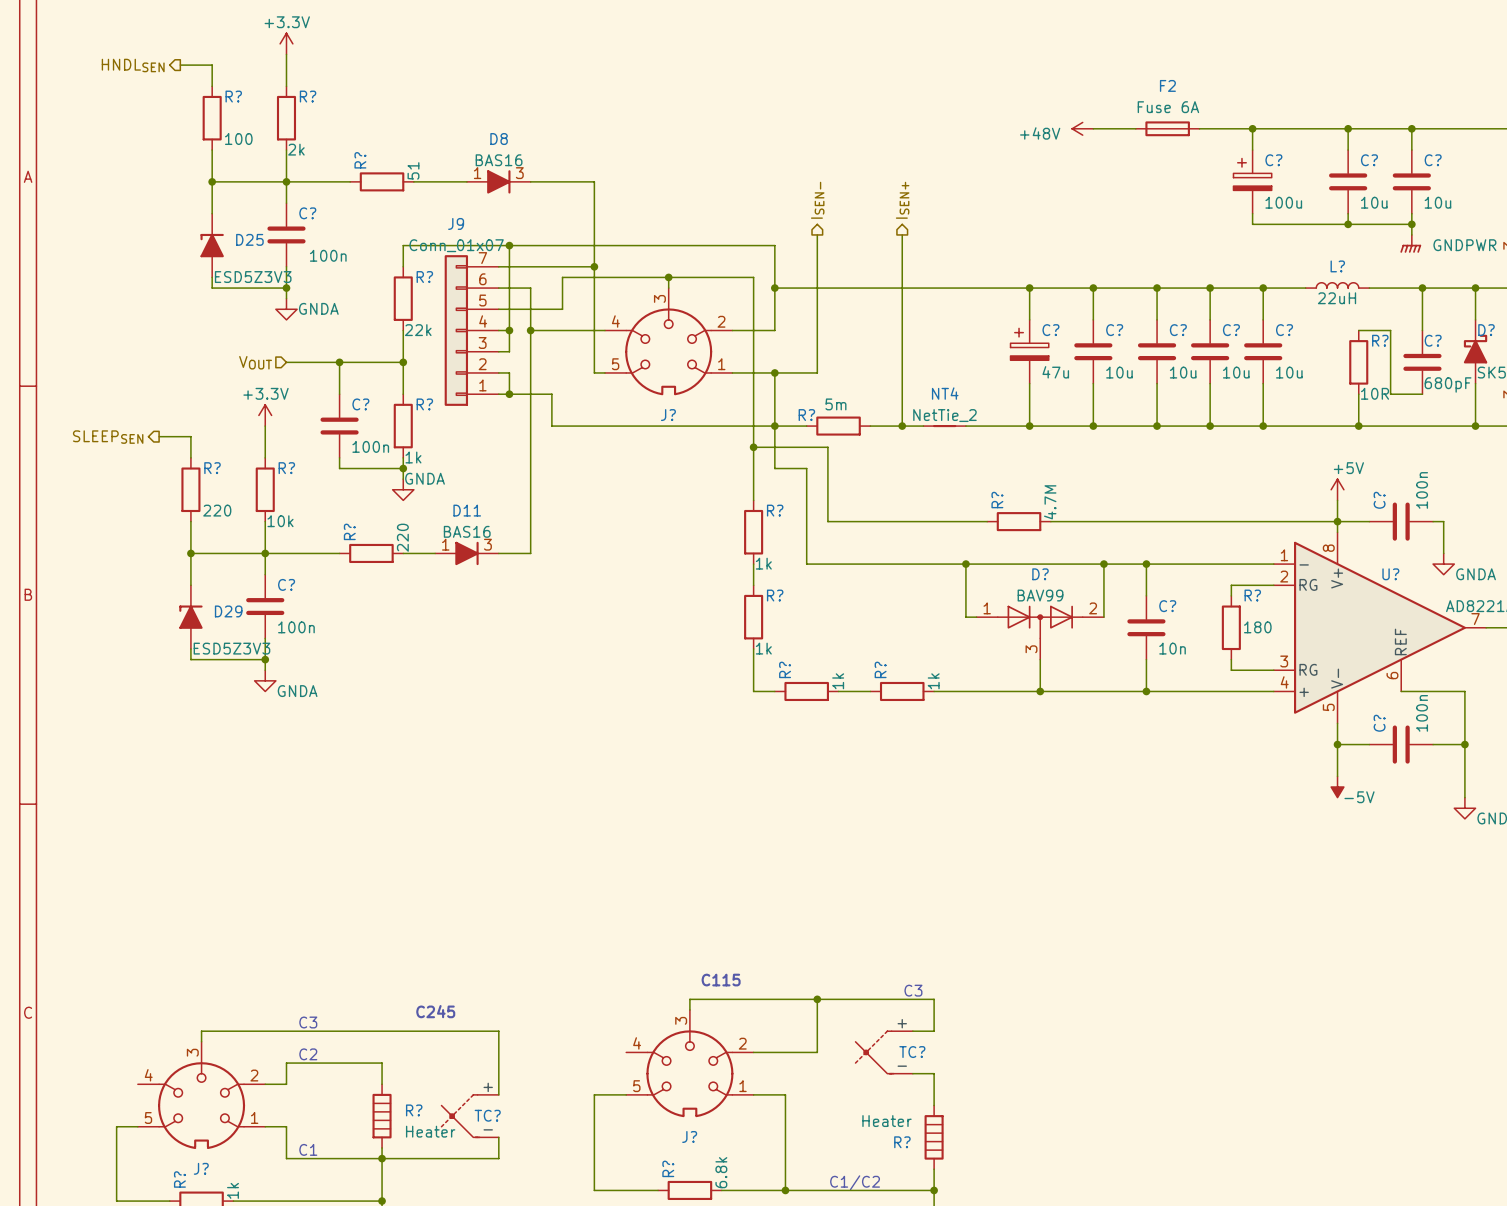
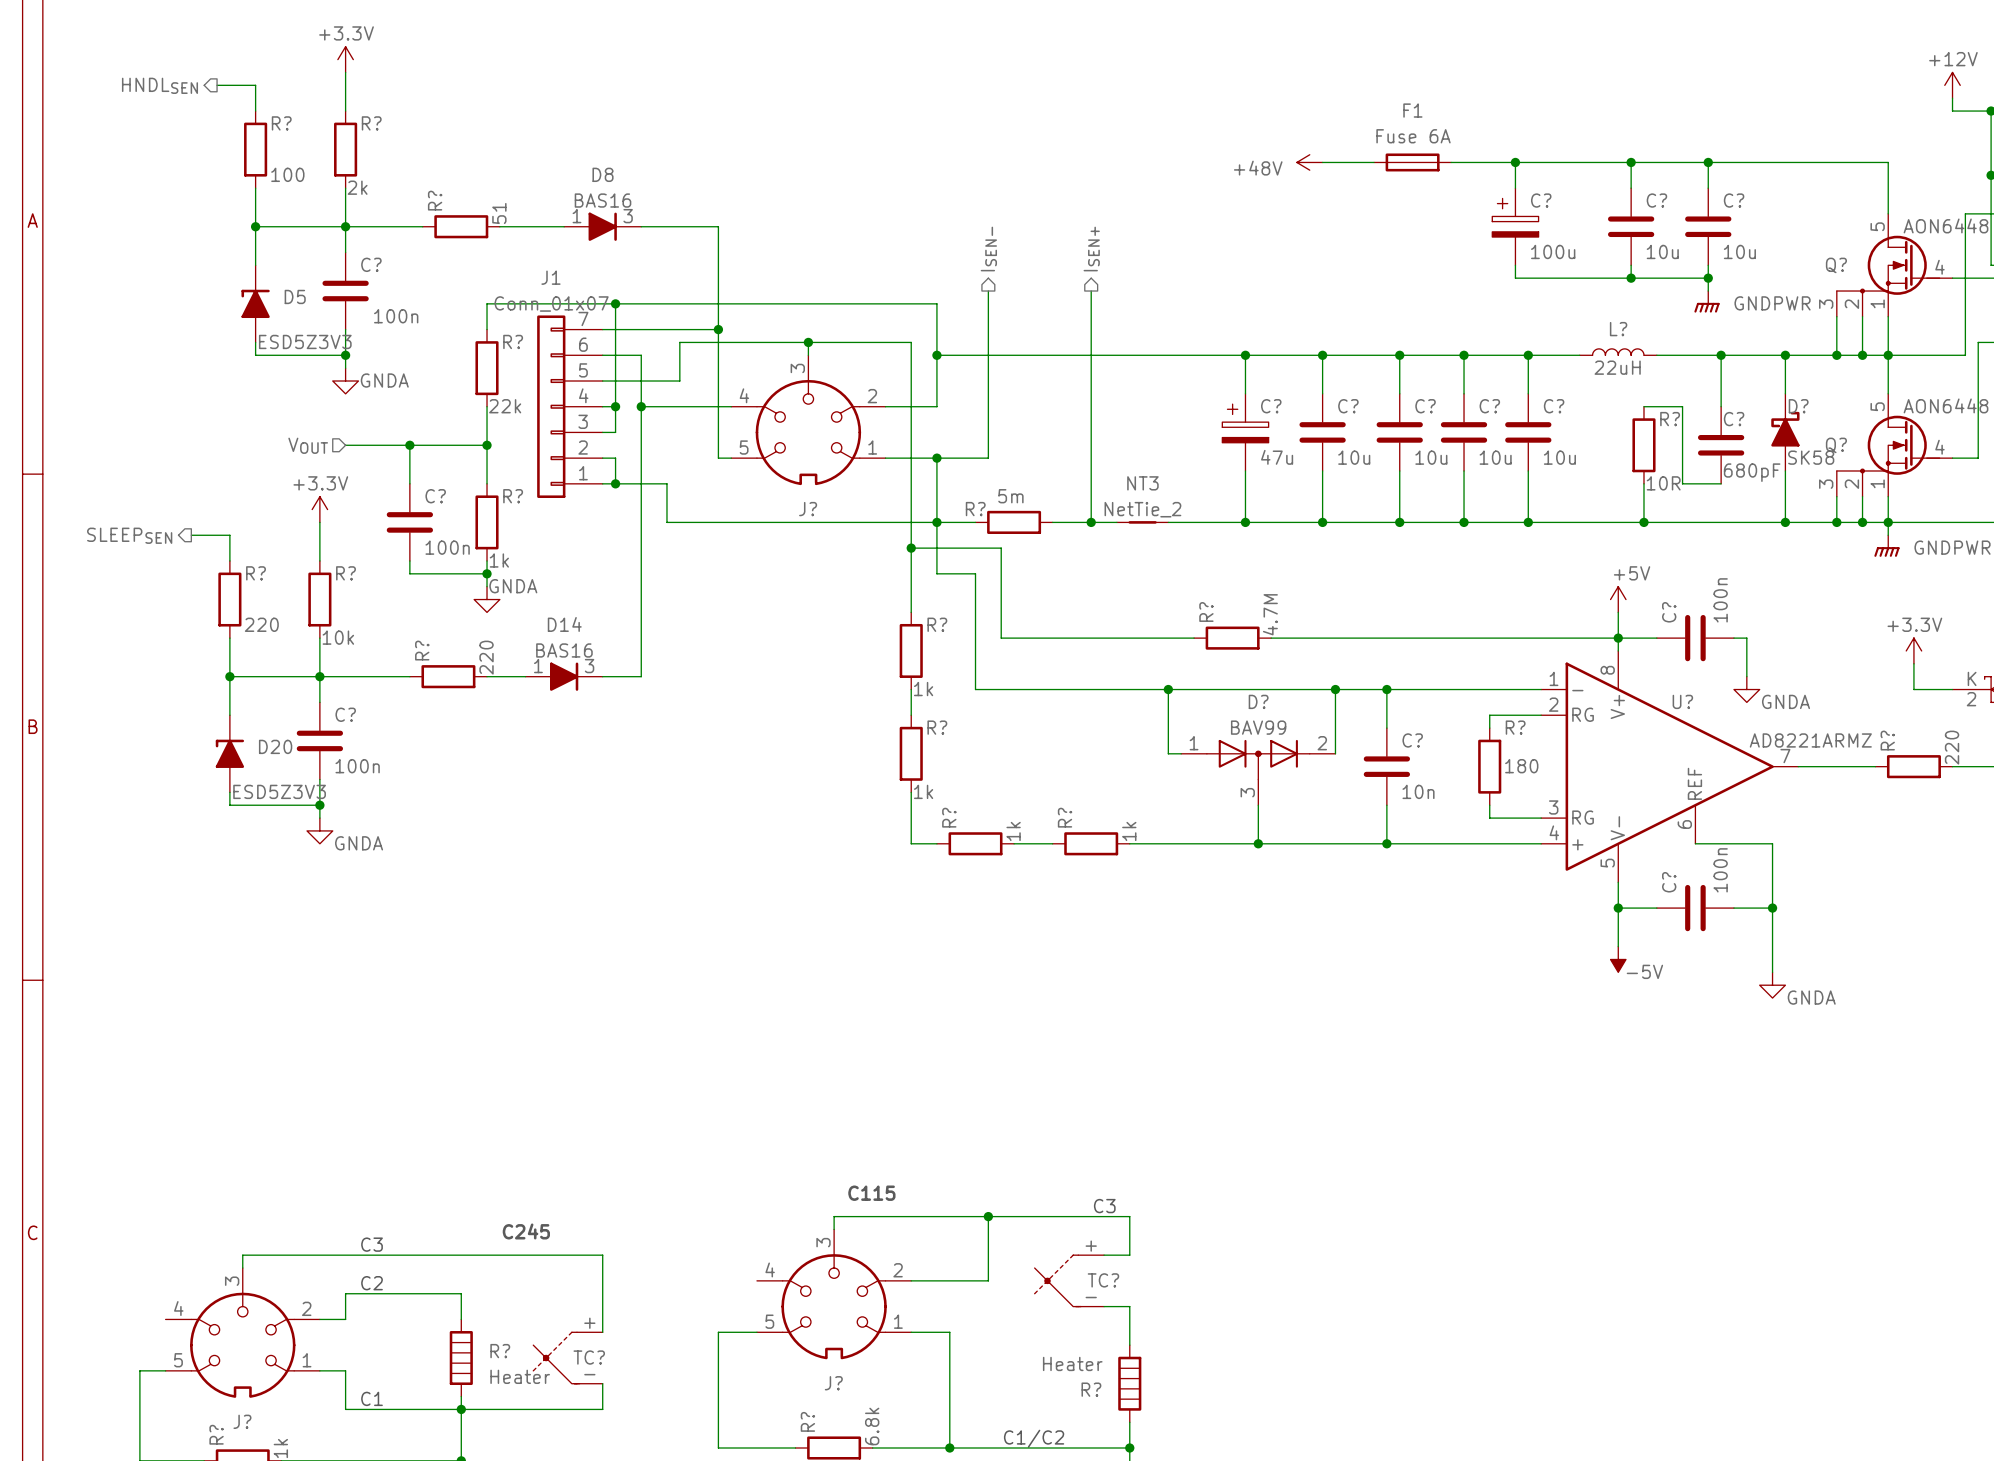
F2 name: F2 (1167, 85) -> F1 (1412, 110)
J9 name: J9 (456, 223) -> J1 (550, 277)
D25 name: D25 (249, 239) -> D5 (295, 296)
NT4 name: NT4 (945, 393) -> NT3 (1142, 483)
D11 name: D11 (467, 510) -> D14 (564, 624)
D29 name: D29 (228, 611) -> D20 (275, 746)

